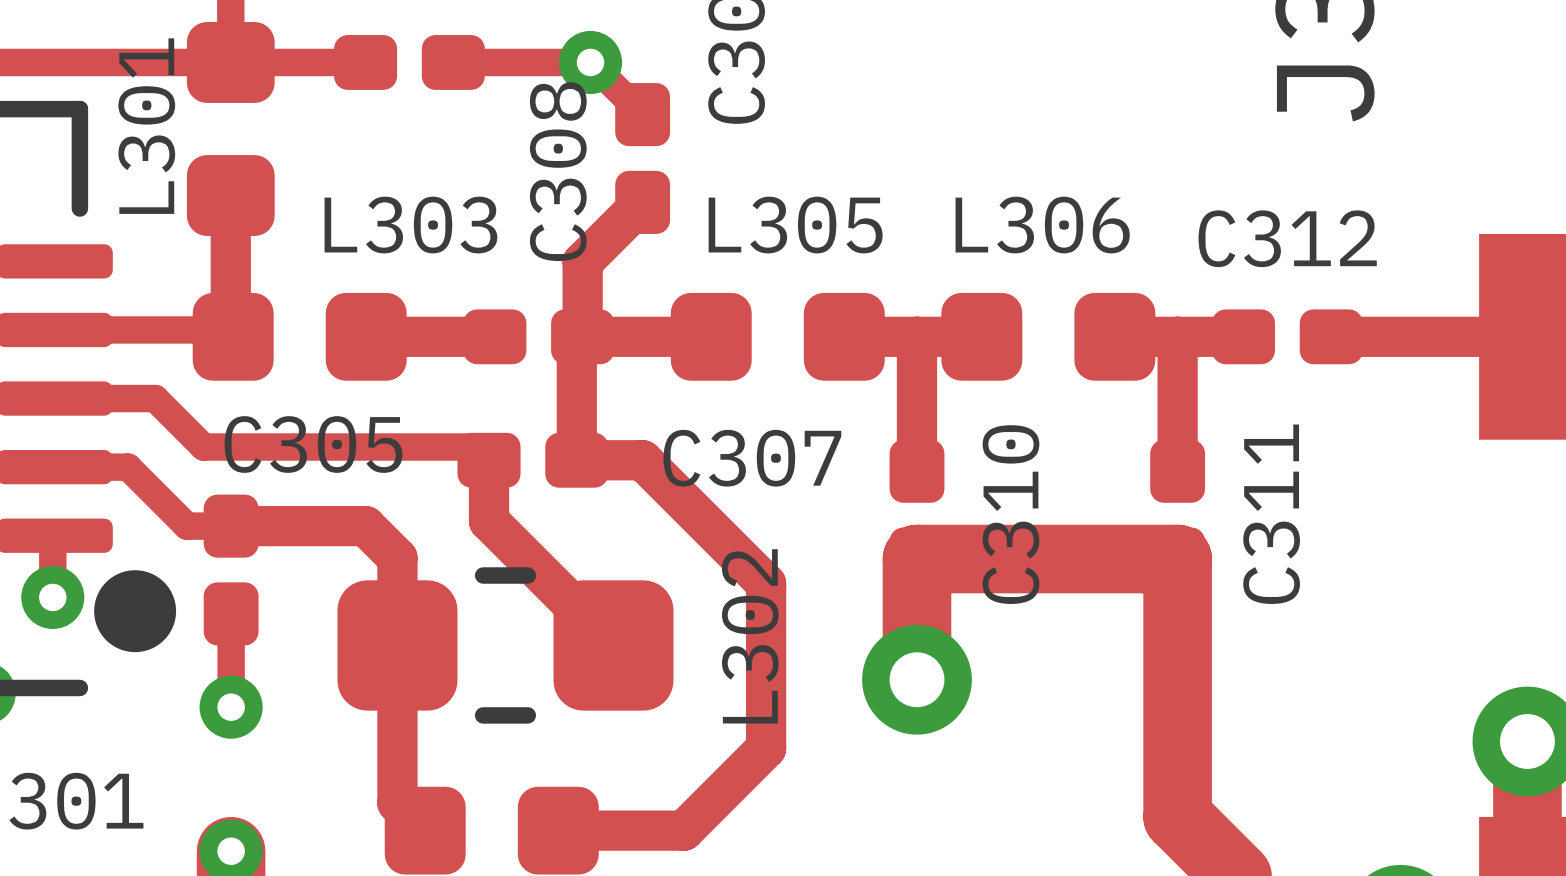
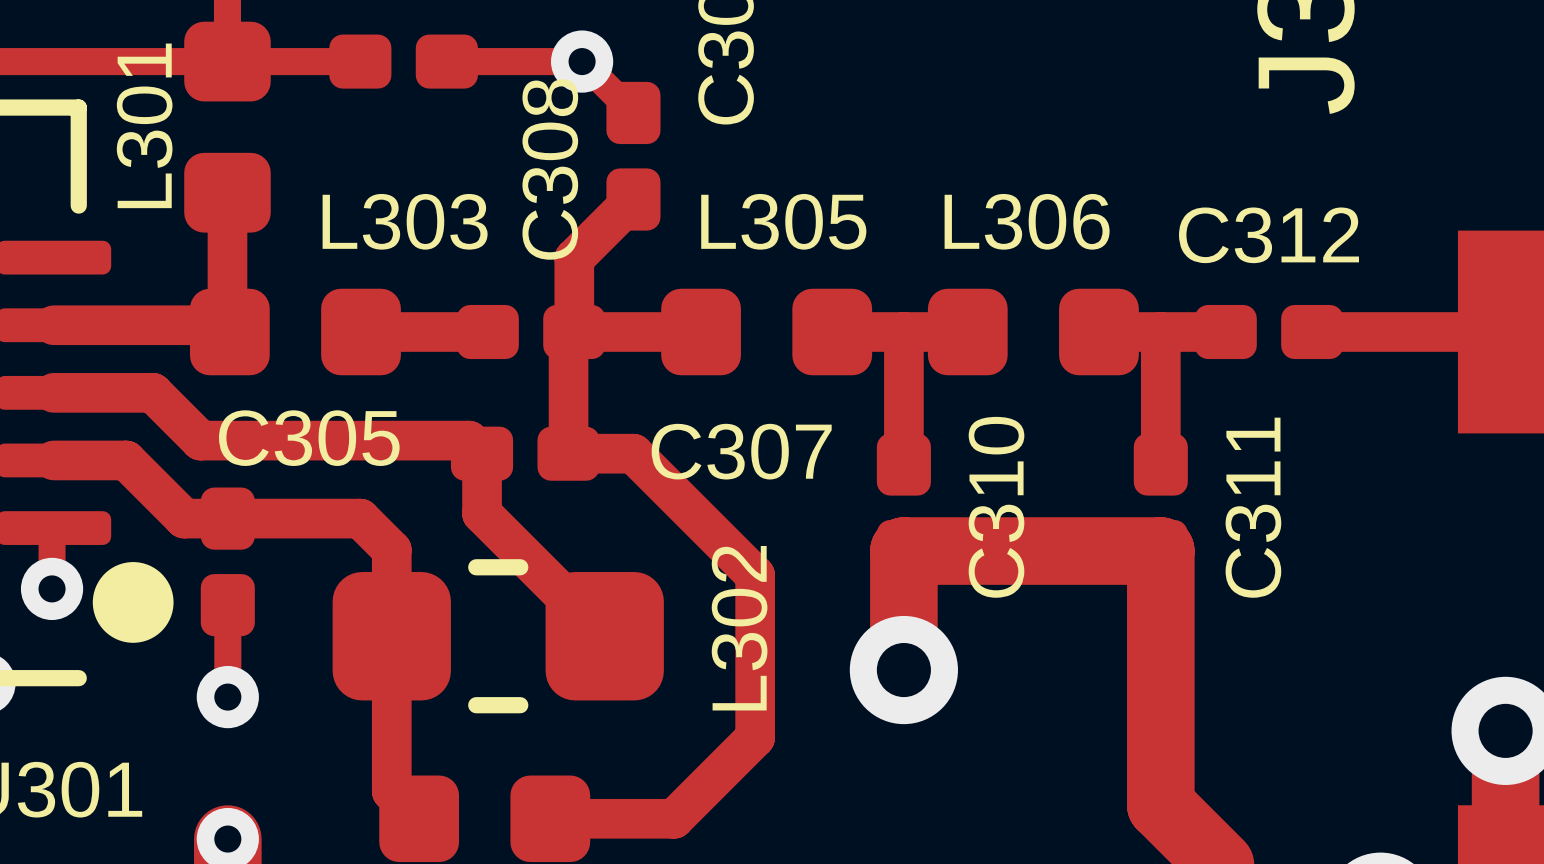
track width: thin (54, 329) (226, 329) -> thick (53, 325) (223, 325)
track width: thin (54, 398) (155, 398) (203, 447) (475, 447) (489, 460) -> thick (53, 392) (152, 392) (200, 440) (468, 440) (482, 453)
track width: thin (54, 467) (128, 467) (187, 526) (231, 526) -> thick (53, 460) (126, 460) (184, 518) (227, 518)

